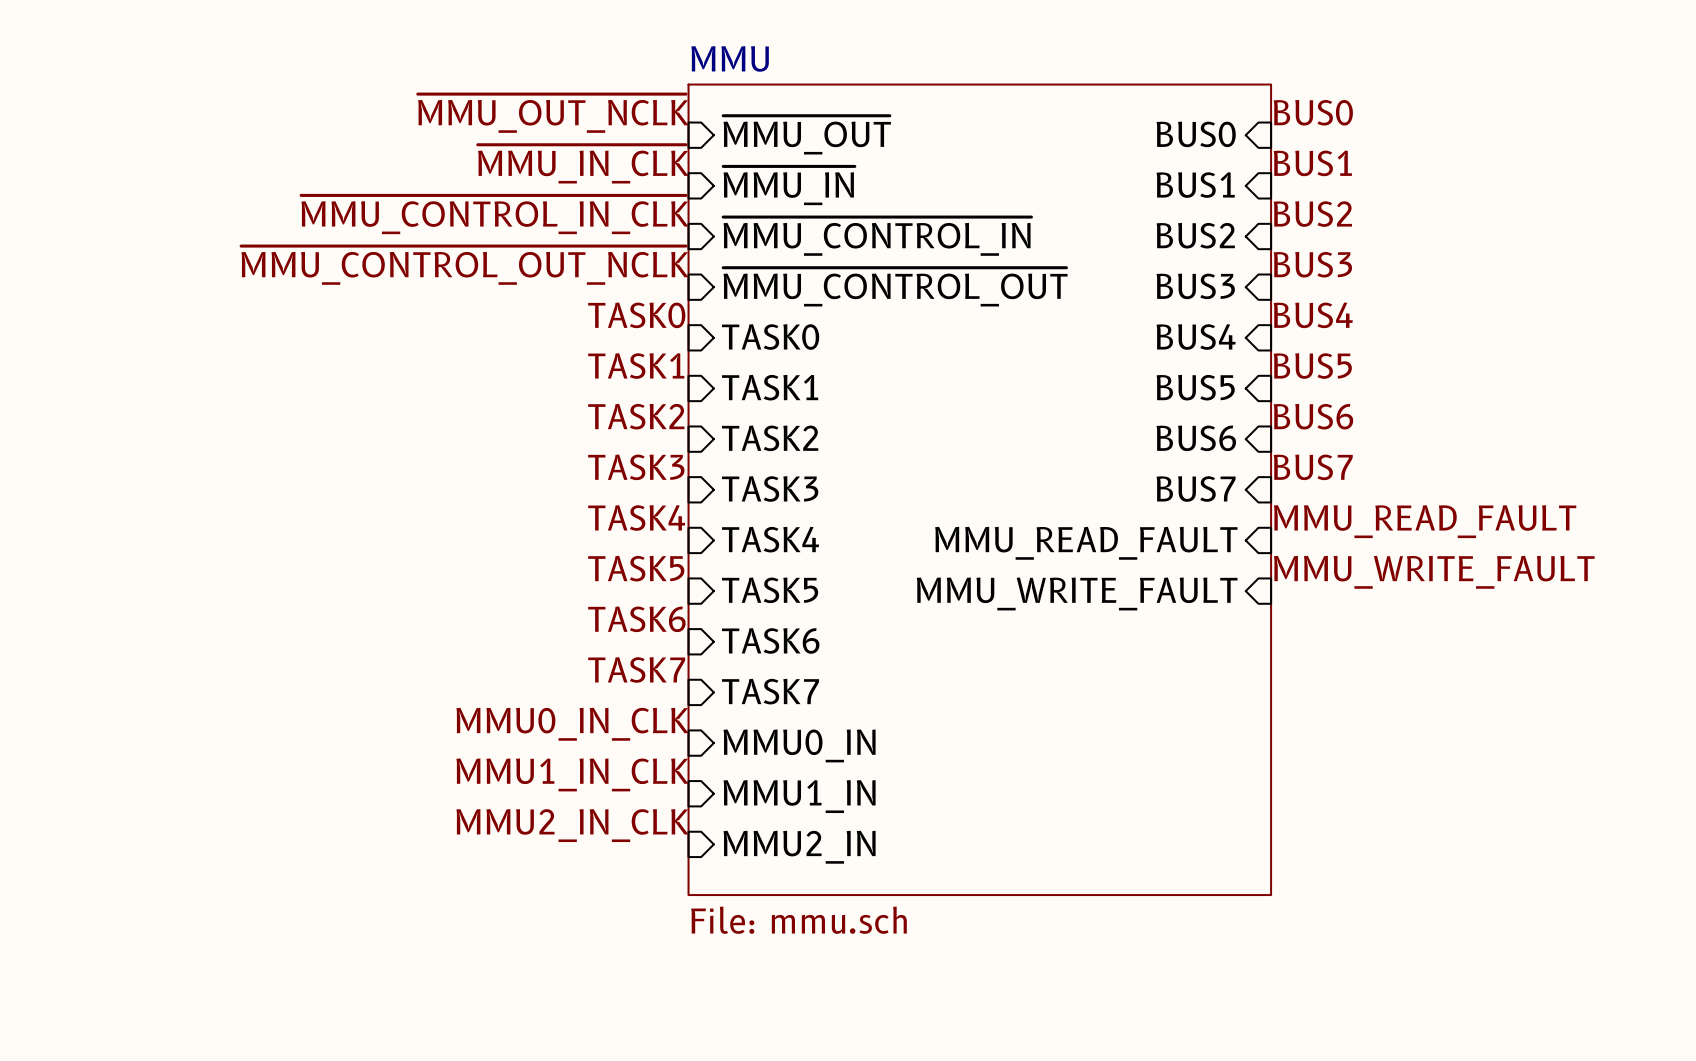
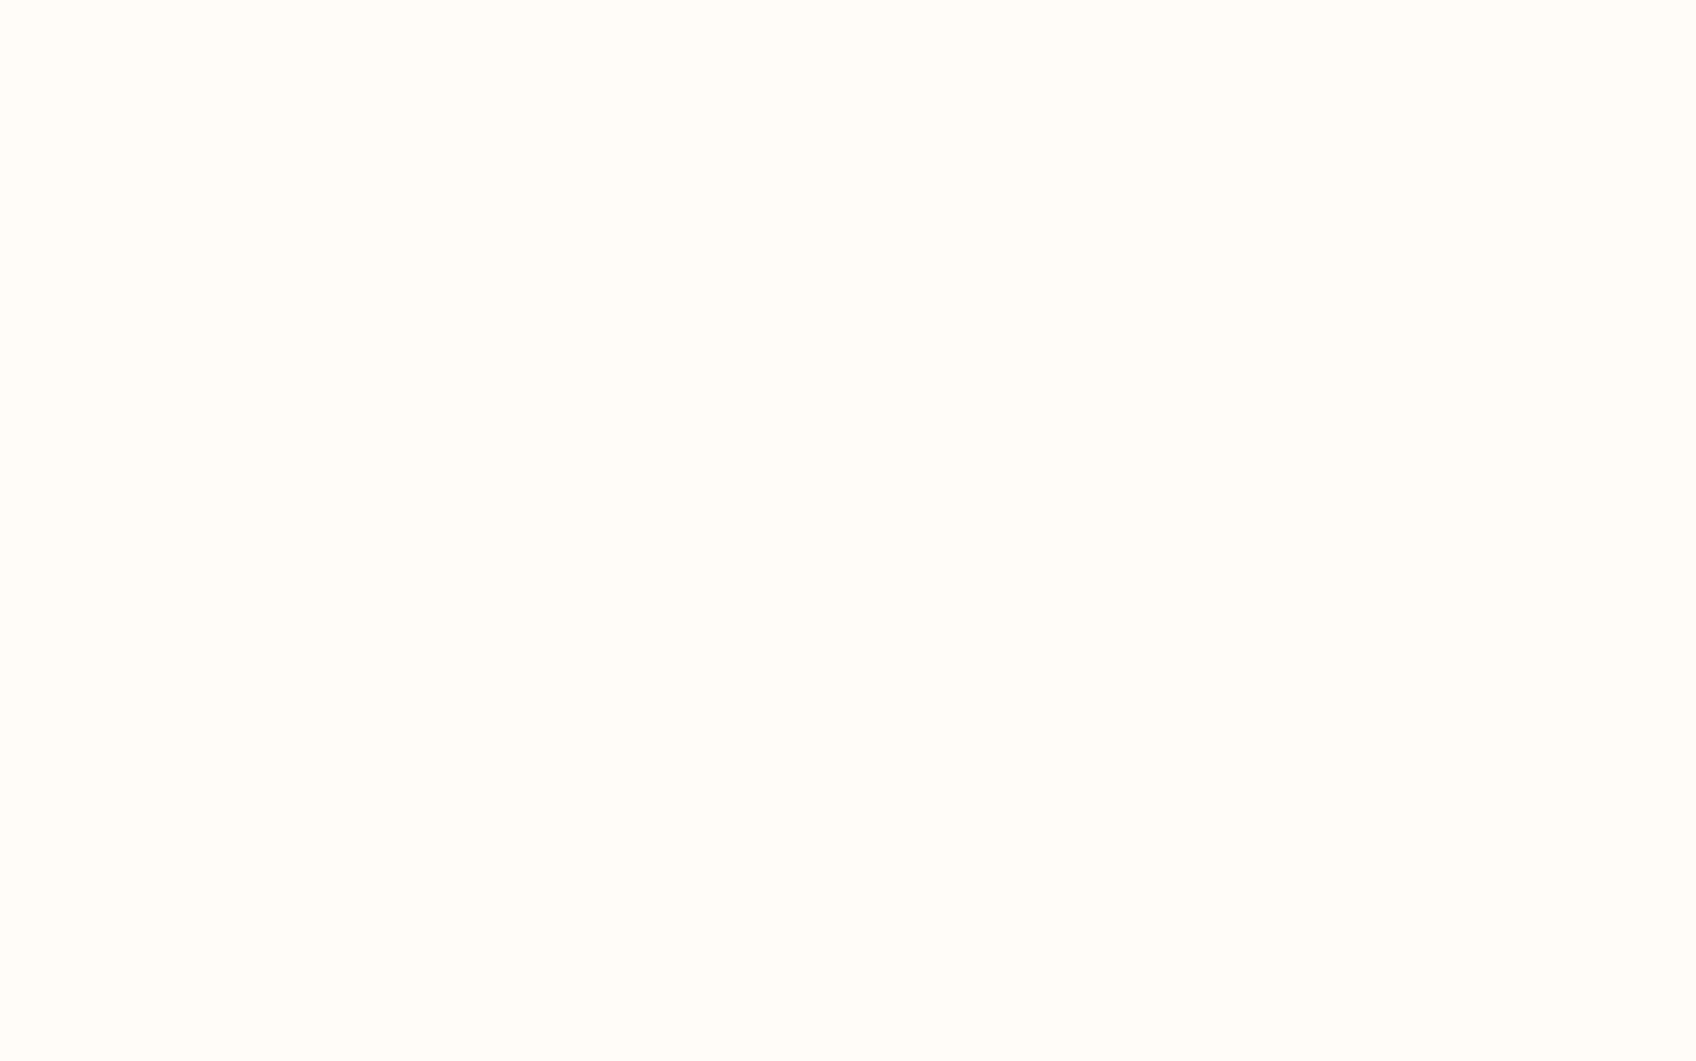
label: BUS0 (1313, 112) -> none
label: ~{MMU_OUT_NCLK} (553, 113) -> none
sheet pin: BUS0 (1196, 134) -> none
sheet pin: ~{MMU_OUT} (807, 135) -> none
label: BUS1 (1312, 163) -> none
label: ~{MMU_IN_CLK} (583, 164) -> none
sheet pin: ~{MMU_IN} (789, 185) -> none
sheet pin: BUS1 (1195, 185) -> none
label: ~{MMU_CONTROL_IN_CLK} (494, 214) -> none
label: BUS2 (1312, 214) -> none
sheet pin: BUS2 (1195, 235) -> none
sheet pin: ~{MMU_CONTROL_IN} (877, 236) -> none
label: BUS3 (1312, 264) -> none
label: ~{MMU_CONTROL_OUT_NCLK} (464, 265) -> none
sheet pin: BUS3 (1195, 286) -> none
sheet pin: ~{MMU_CONTROL_OUT} (895, 287) -> none
label: TASK0 (636, 315) -> none
label: BUS4 (1313, 315) -> none
sheet pin: TASK0 (770, 337) -> none
sheet pin: BUS4 (1196, 337) -> none
label: TASK1 (636, 366) -> none
label: BUS5 (1312, 366) -> none
sheet pin: TASK1 (770, 387) -> none
sheet pin: BUS5 (1195, 387) -> none
label: TASK2 (636, 416) -> none
label: BUS6 (1313, 416) -> none
sheet pin: TASK2 (770, 438) -> none
sheet pin: BUS6 (1196, 438) -> none
label: TASK3 (636, 467) -> none
label: BUS7 (1313, 467) -> none
sheet pin: TASK3 (770, 488) -> none
sheet pin: BUS7 (1196, 488) -> none
sheet MMU: File: mmu.sch (979, 489) -> none
label: TASK4 (636, 517) -> none
label: MMU_READ_FAULT (1425, 521) -> none
sheet pin: TASK4 (770, 539) -> none
sheet pin: MMU_READ_FAULT (1086, 543) -> none
label: TASK5 (636, 568) -> none
label: MMU_WRITE_FAULT (1434, 572) -> none
sheet pin: TASK5 (770, 590) -> none
sheet pin: MMU_WRITE_FAULT (1077, 593) -> none
label: TASK6 (636, 619) -> none
sheet pin: TASK6 (770, 640) -> none
label: TASK7 (636, 669) -> none
sheet pin: TASK7 (770, 691) -> none
label: MMU0_IN_CLK (572, 724) -> none
sheet pin: MMU0_IN (799, 745) -> none
label: MMU1_IN_CLK (572, 774) -> none
sheet pin: MMU1_IN (799, 796) -> none
label: MMU2_IN_CLK (572, 825) -> none
sheet pin: MMU2_IN (799, 847) -> none

